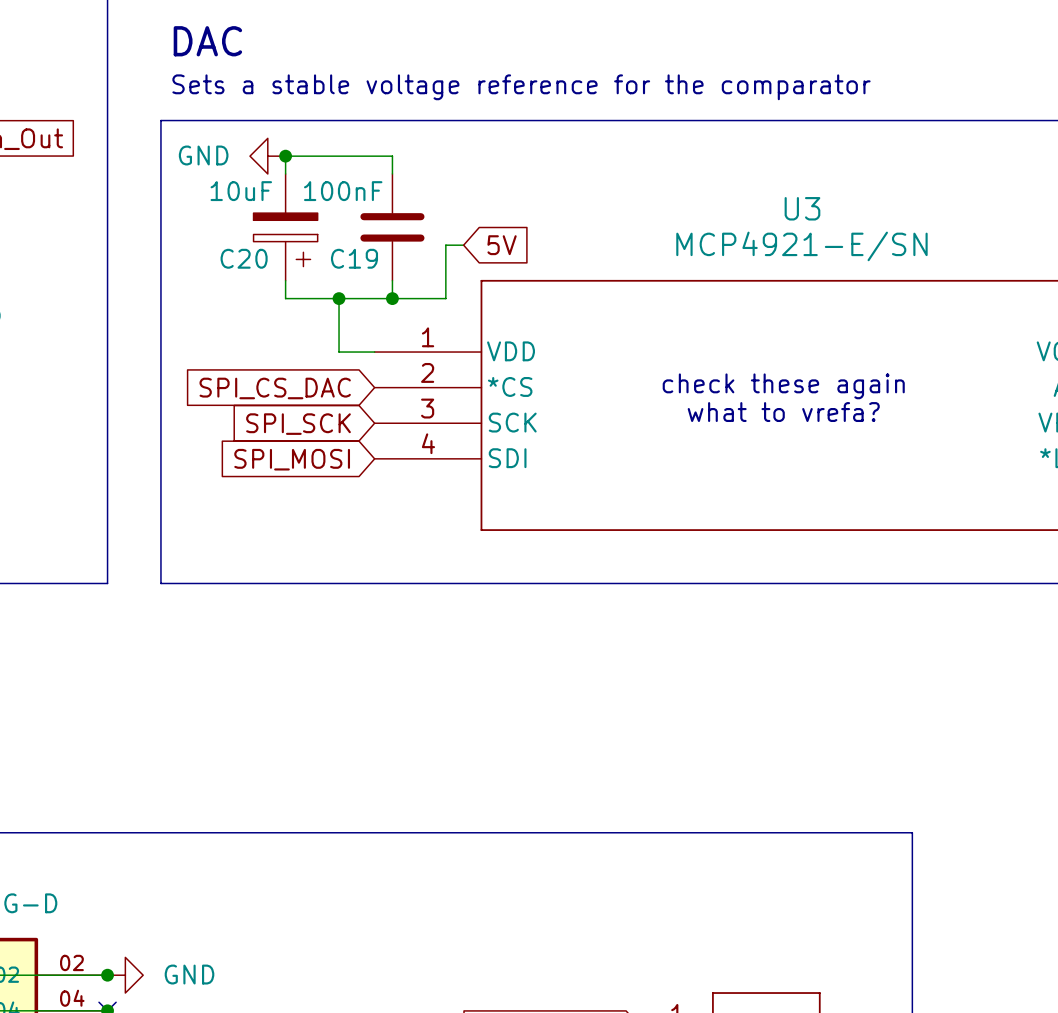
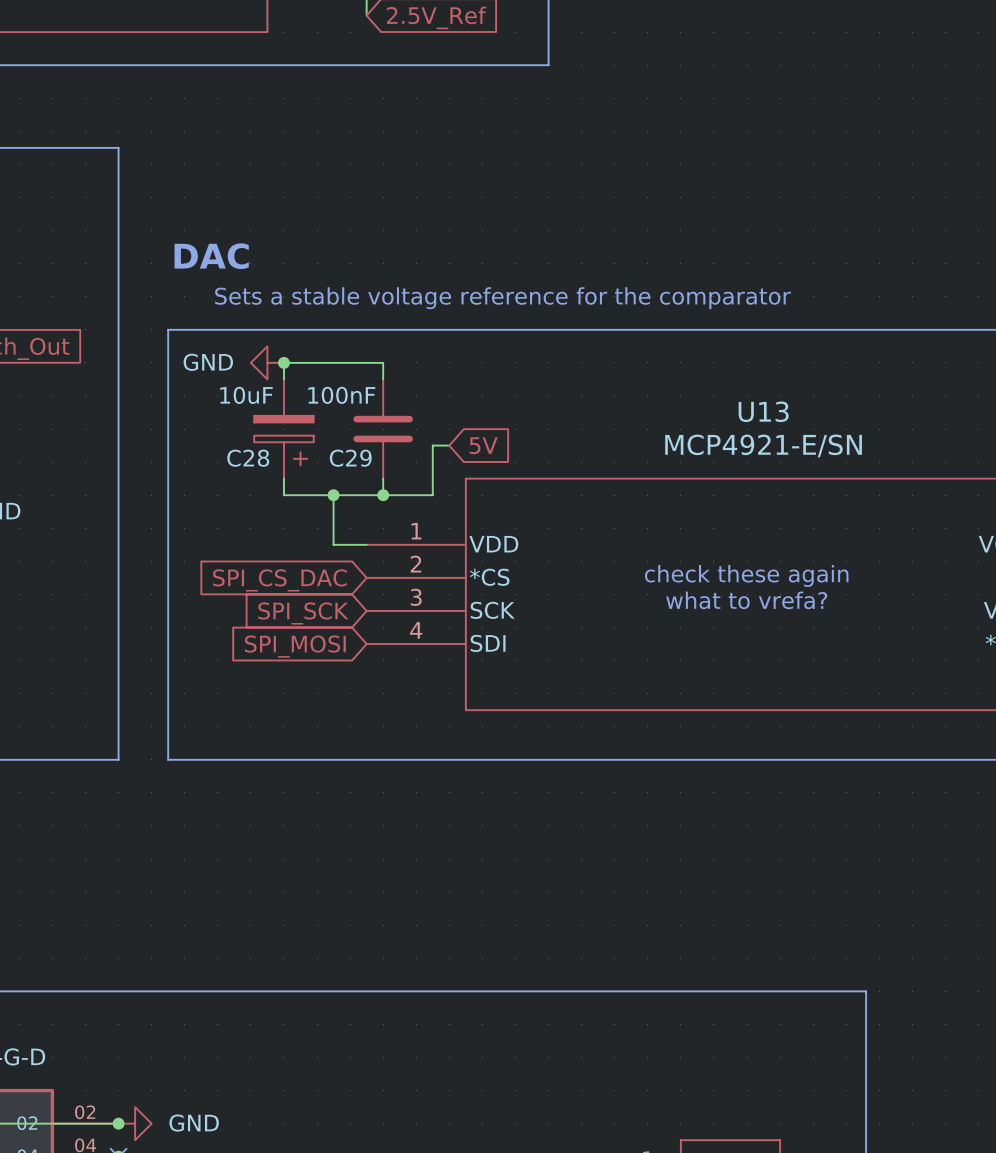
U3 name: U3 (802, 208) -> U13 (763, 411)
C20 name: C20 (244, 258) -> C28 (248, 458)
C19 name: C19 (354, 258) -> C29 (350, 458)

